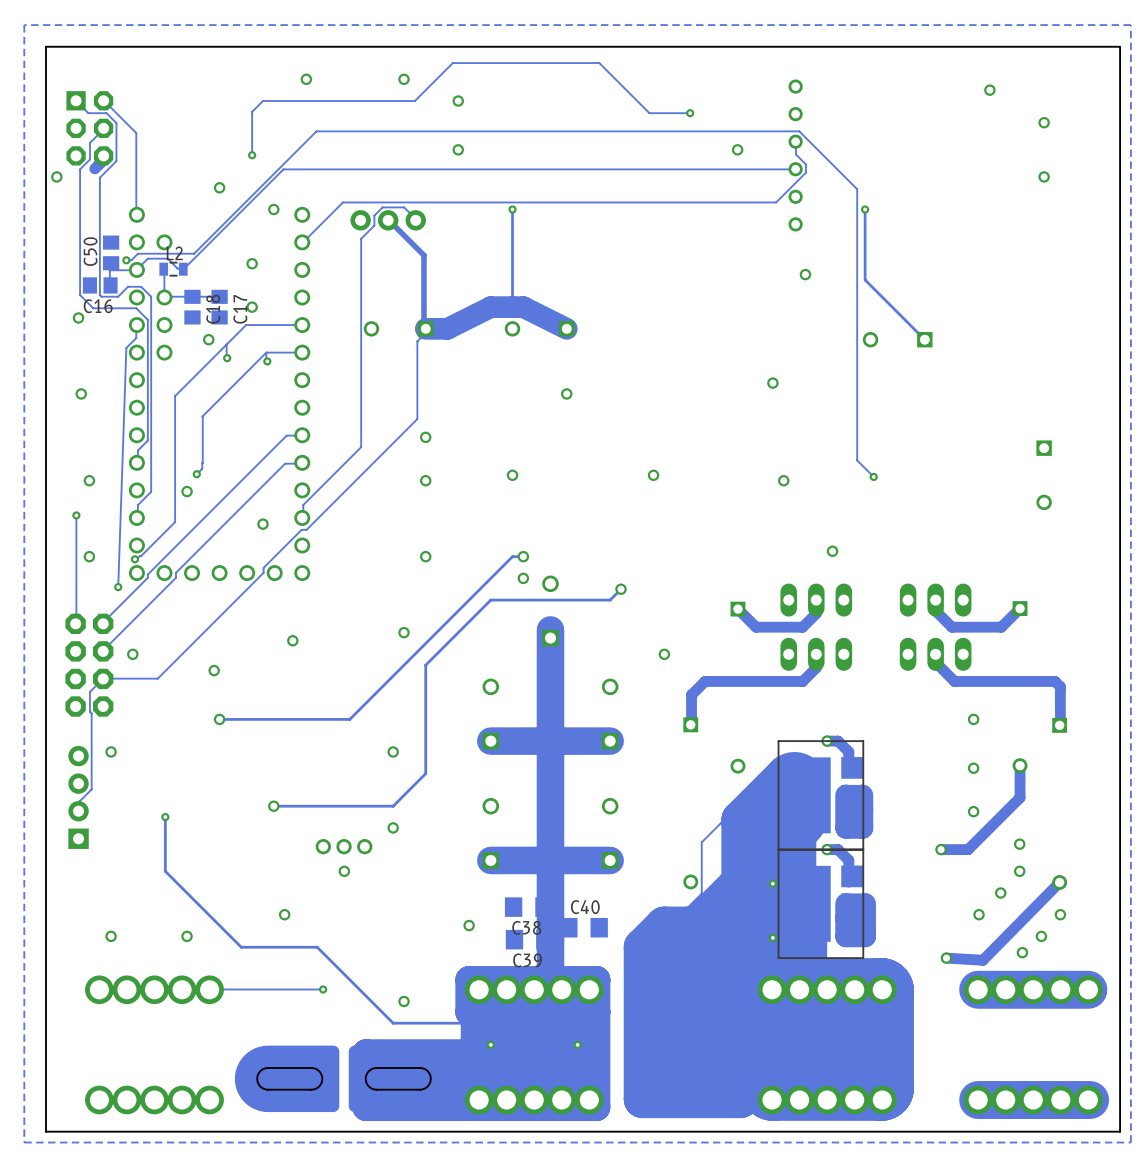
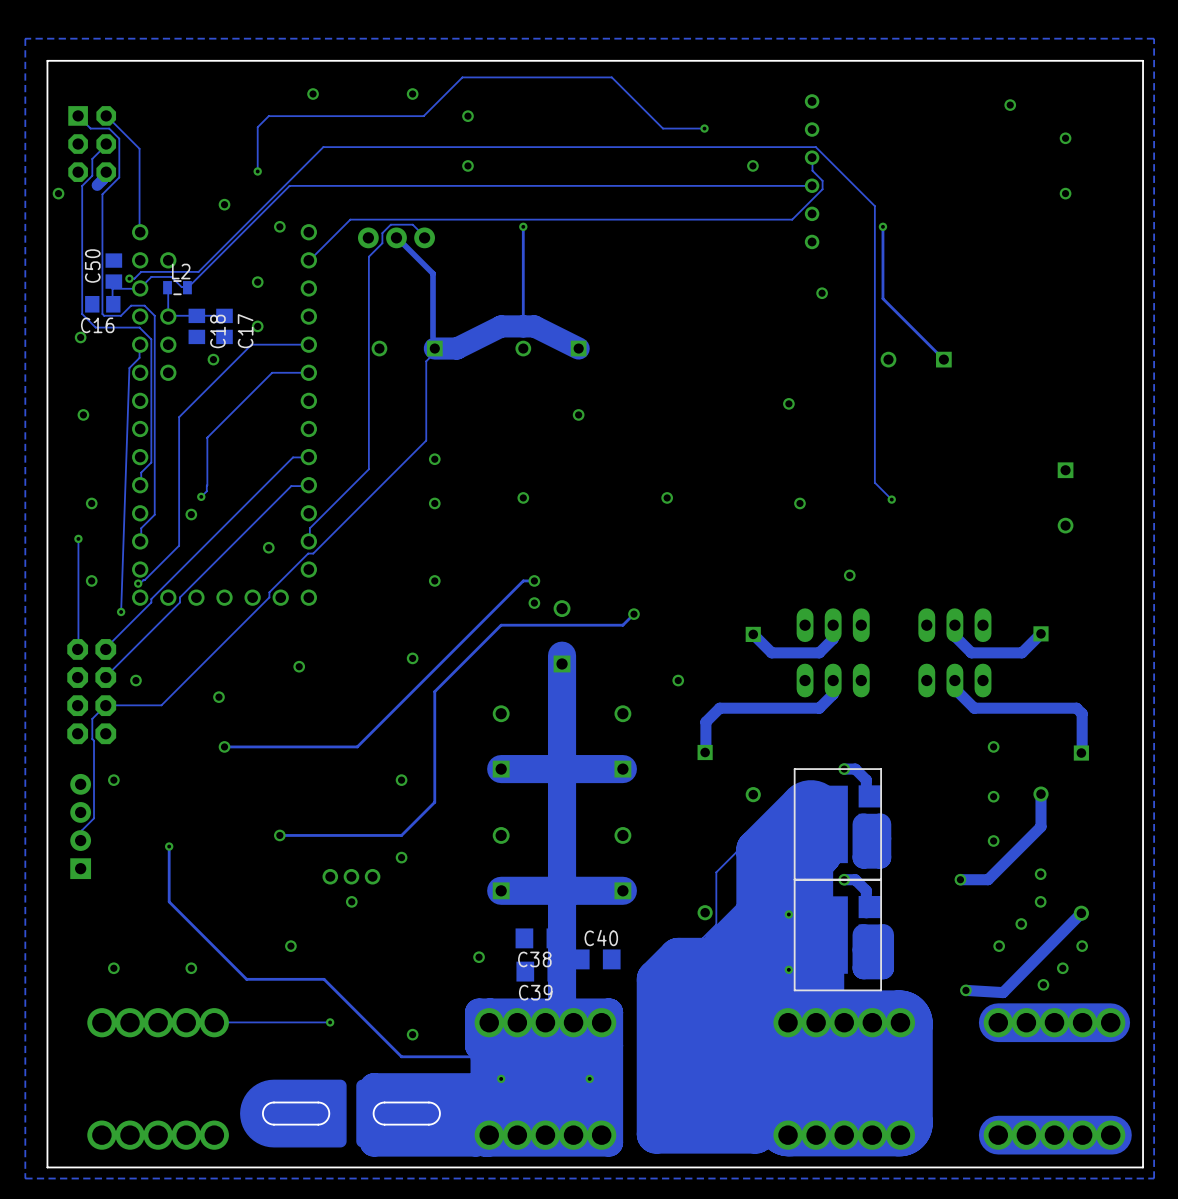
track: (226, 344) (227, 358) -> none
track: (266, 352) (267, 361) -> none
via: (227, 358) -> none
via: (267, 361) -> none

